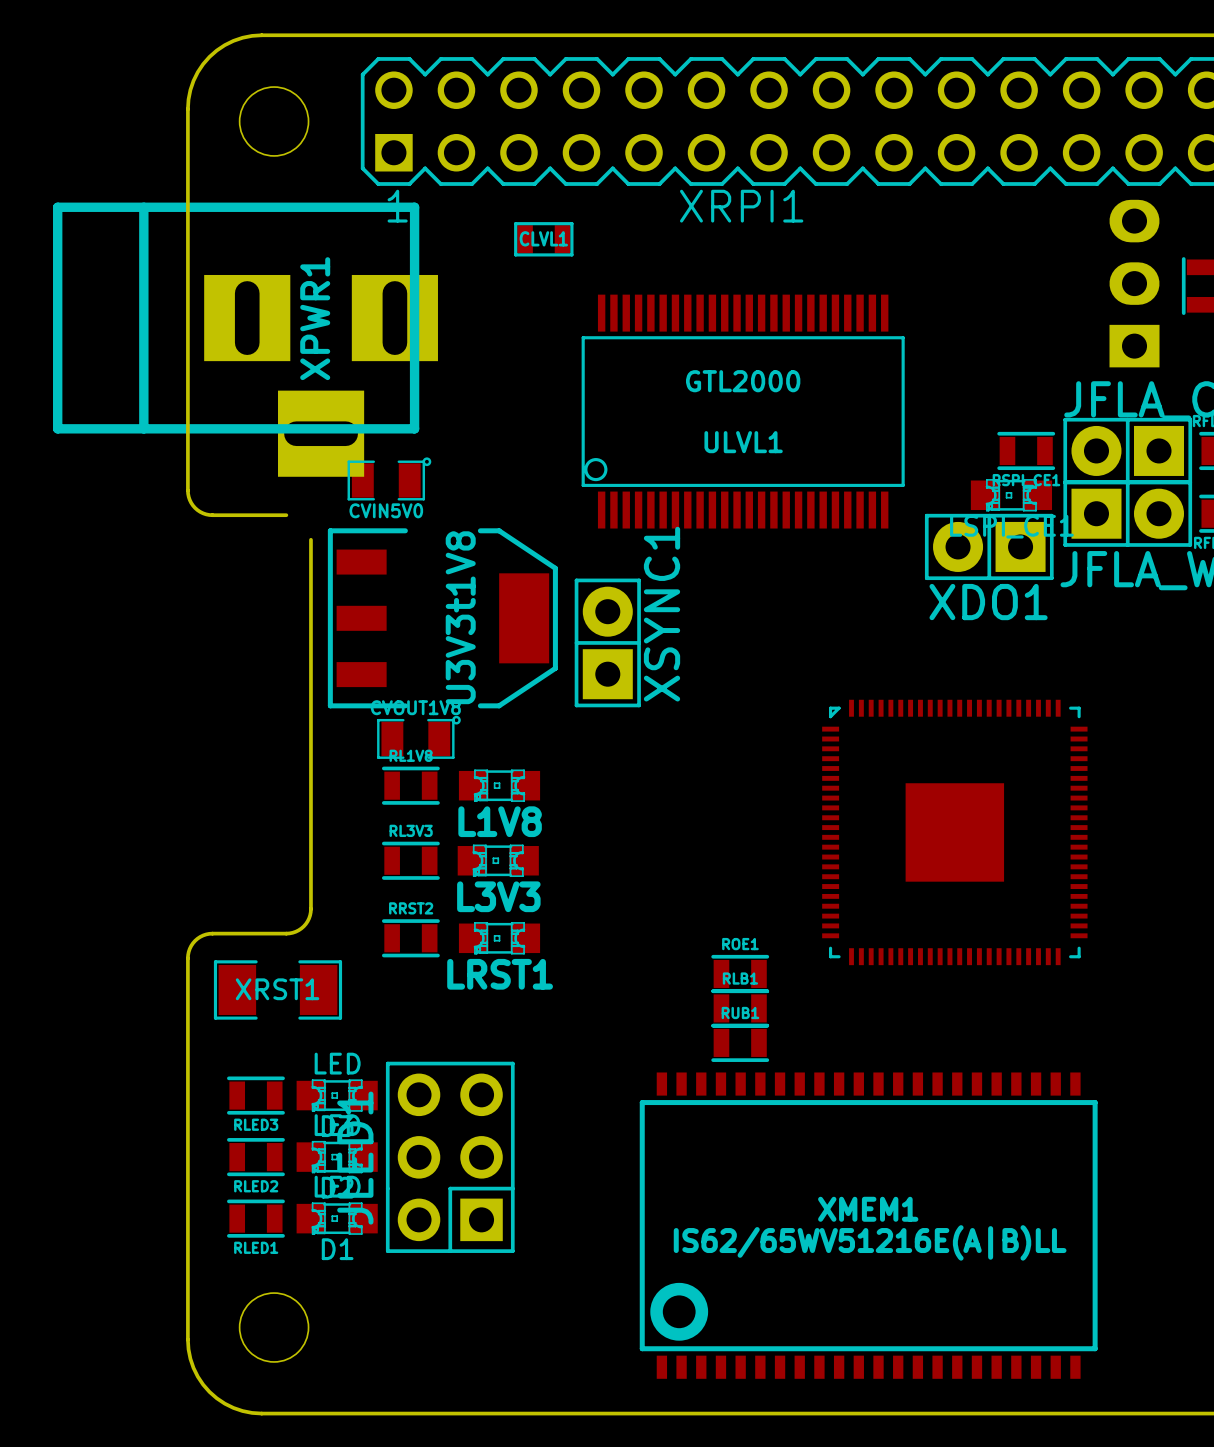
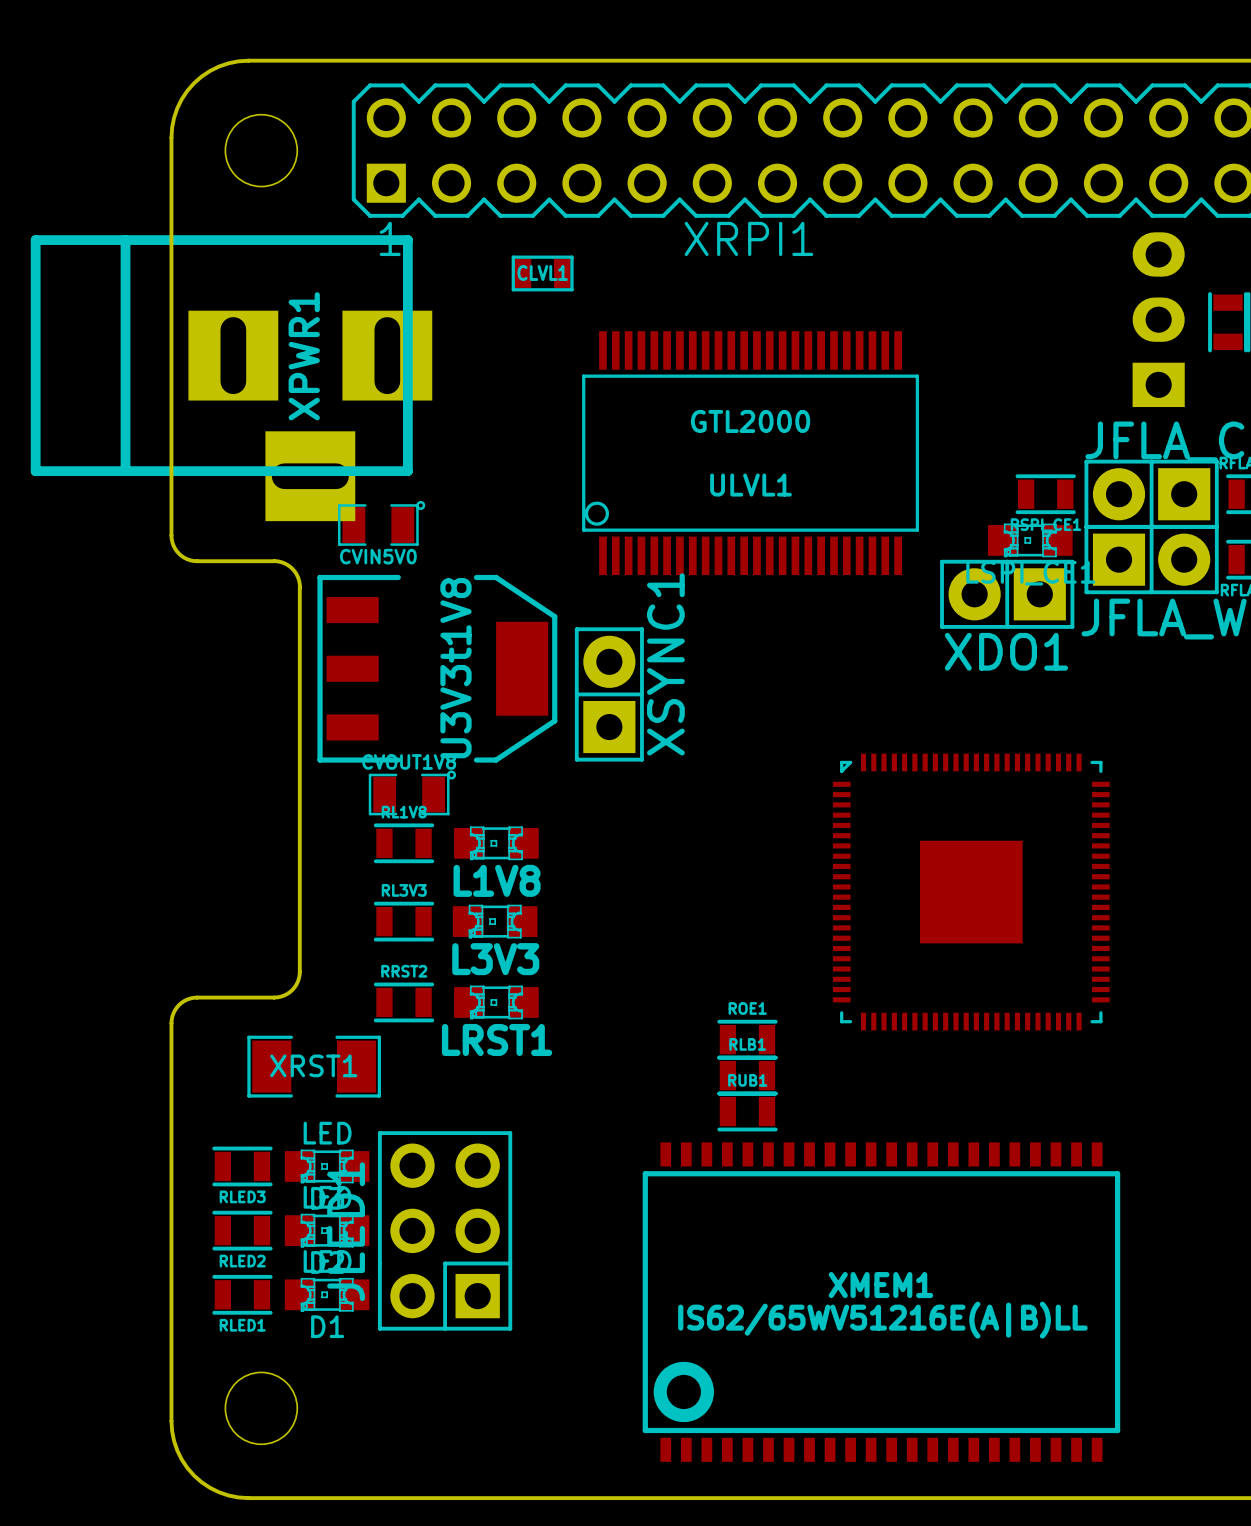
board edge: none -> (274, 561) (284, 563) (292, 569) (298, 577) (299, 587)
XRST1 position: (277, 989) -> (314, 1066)

